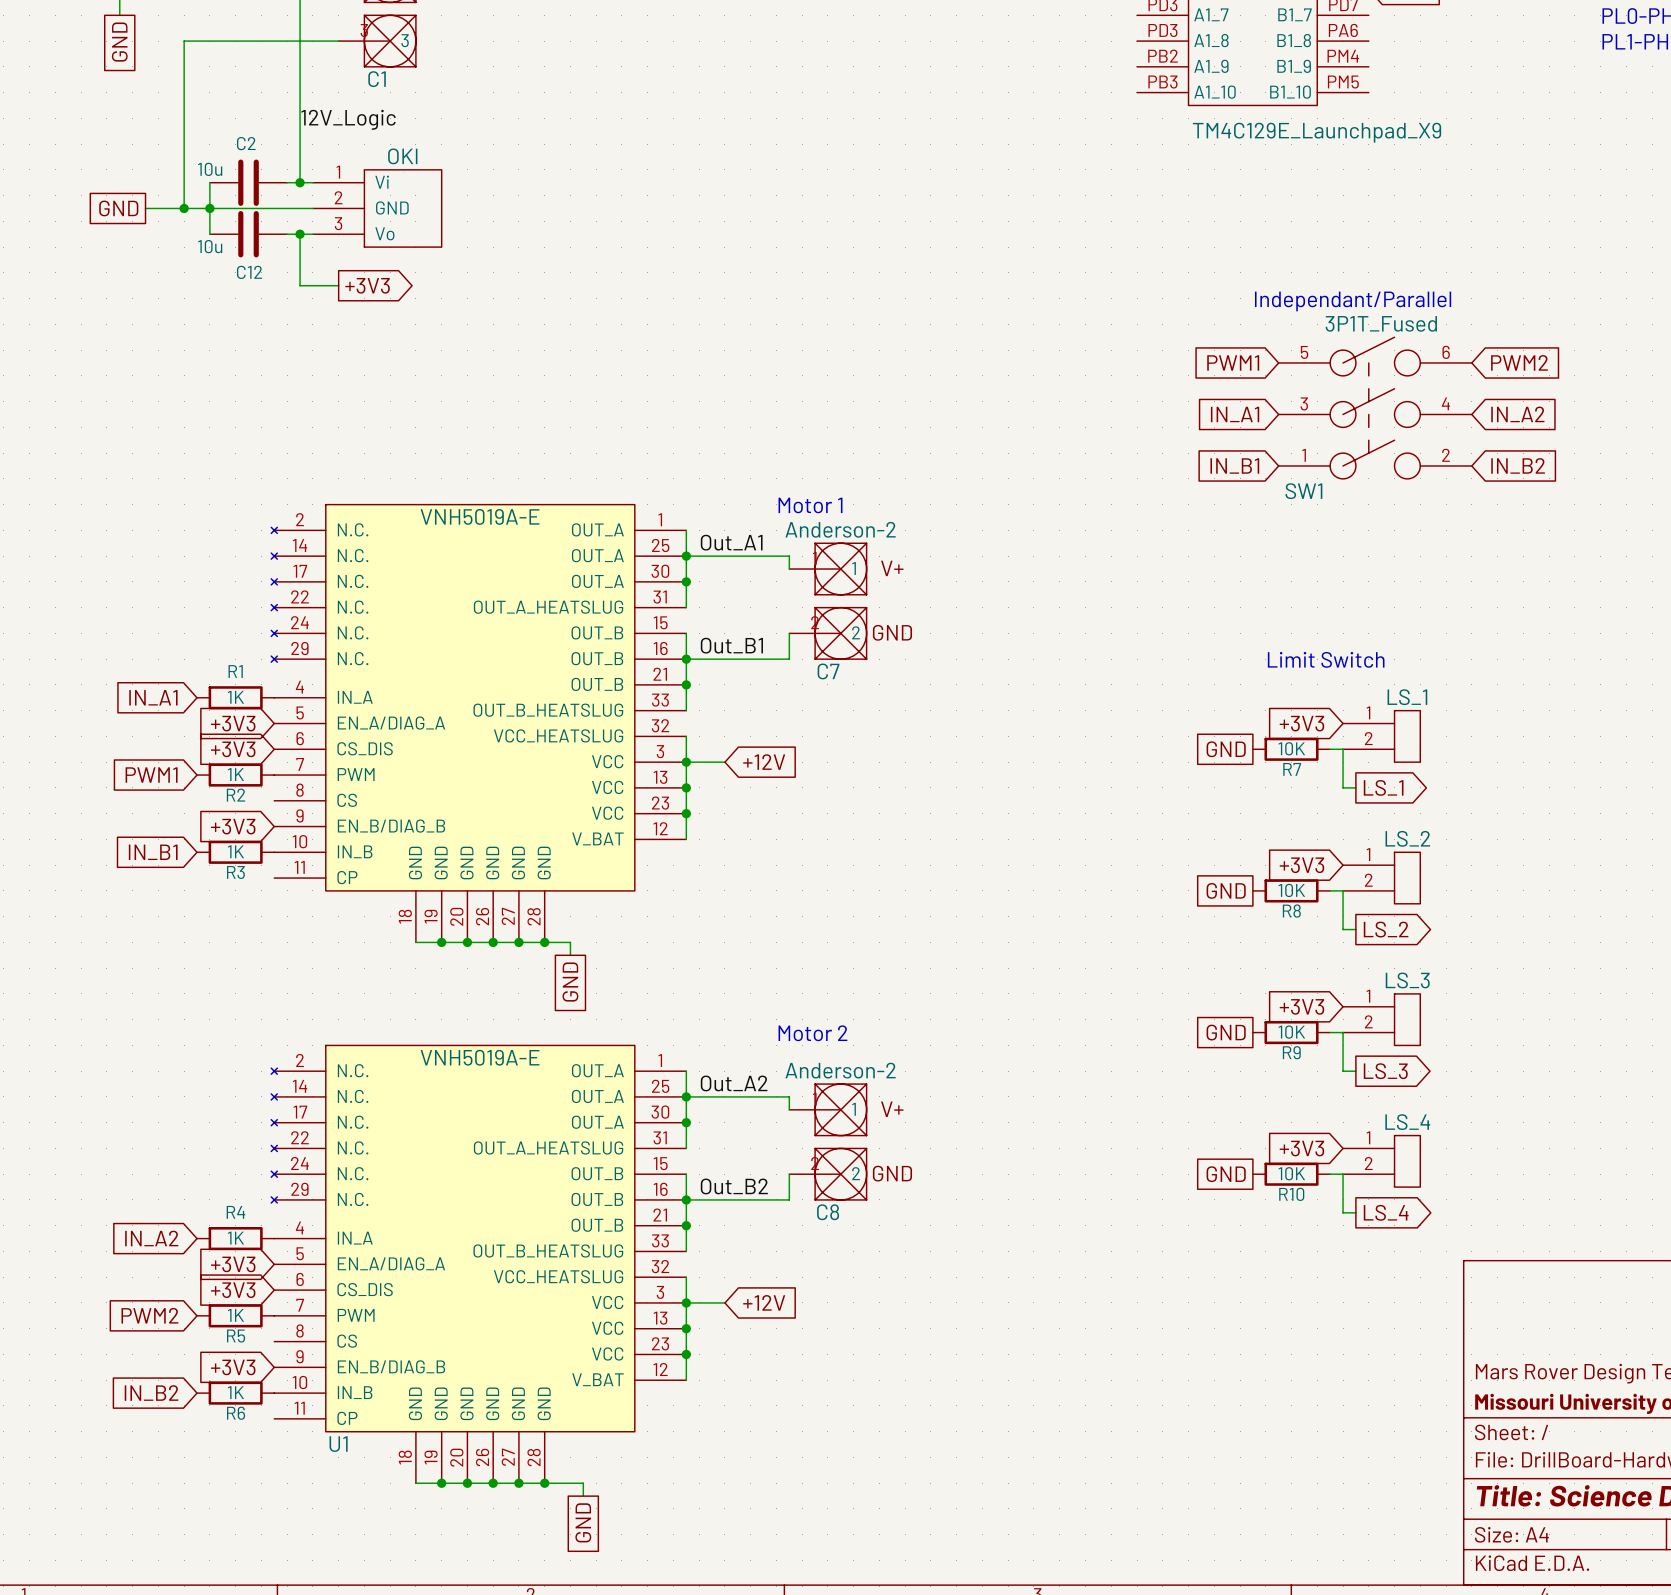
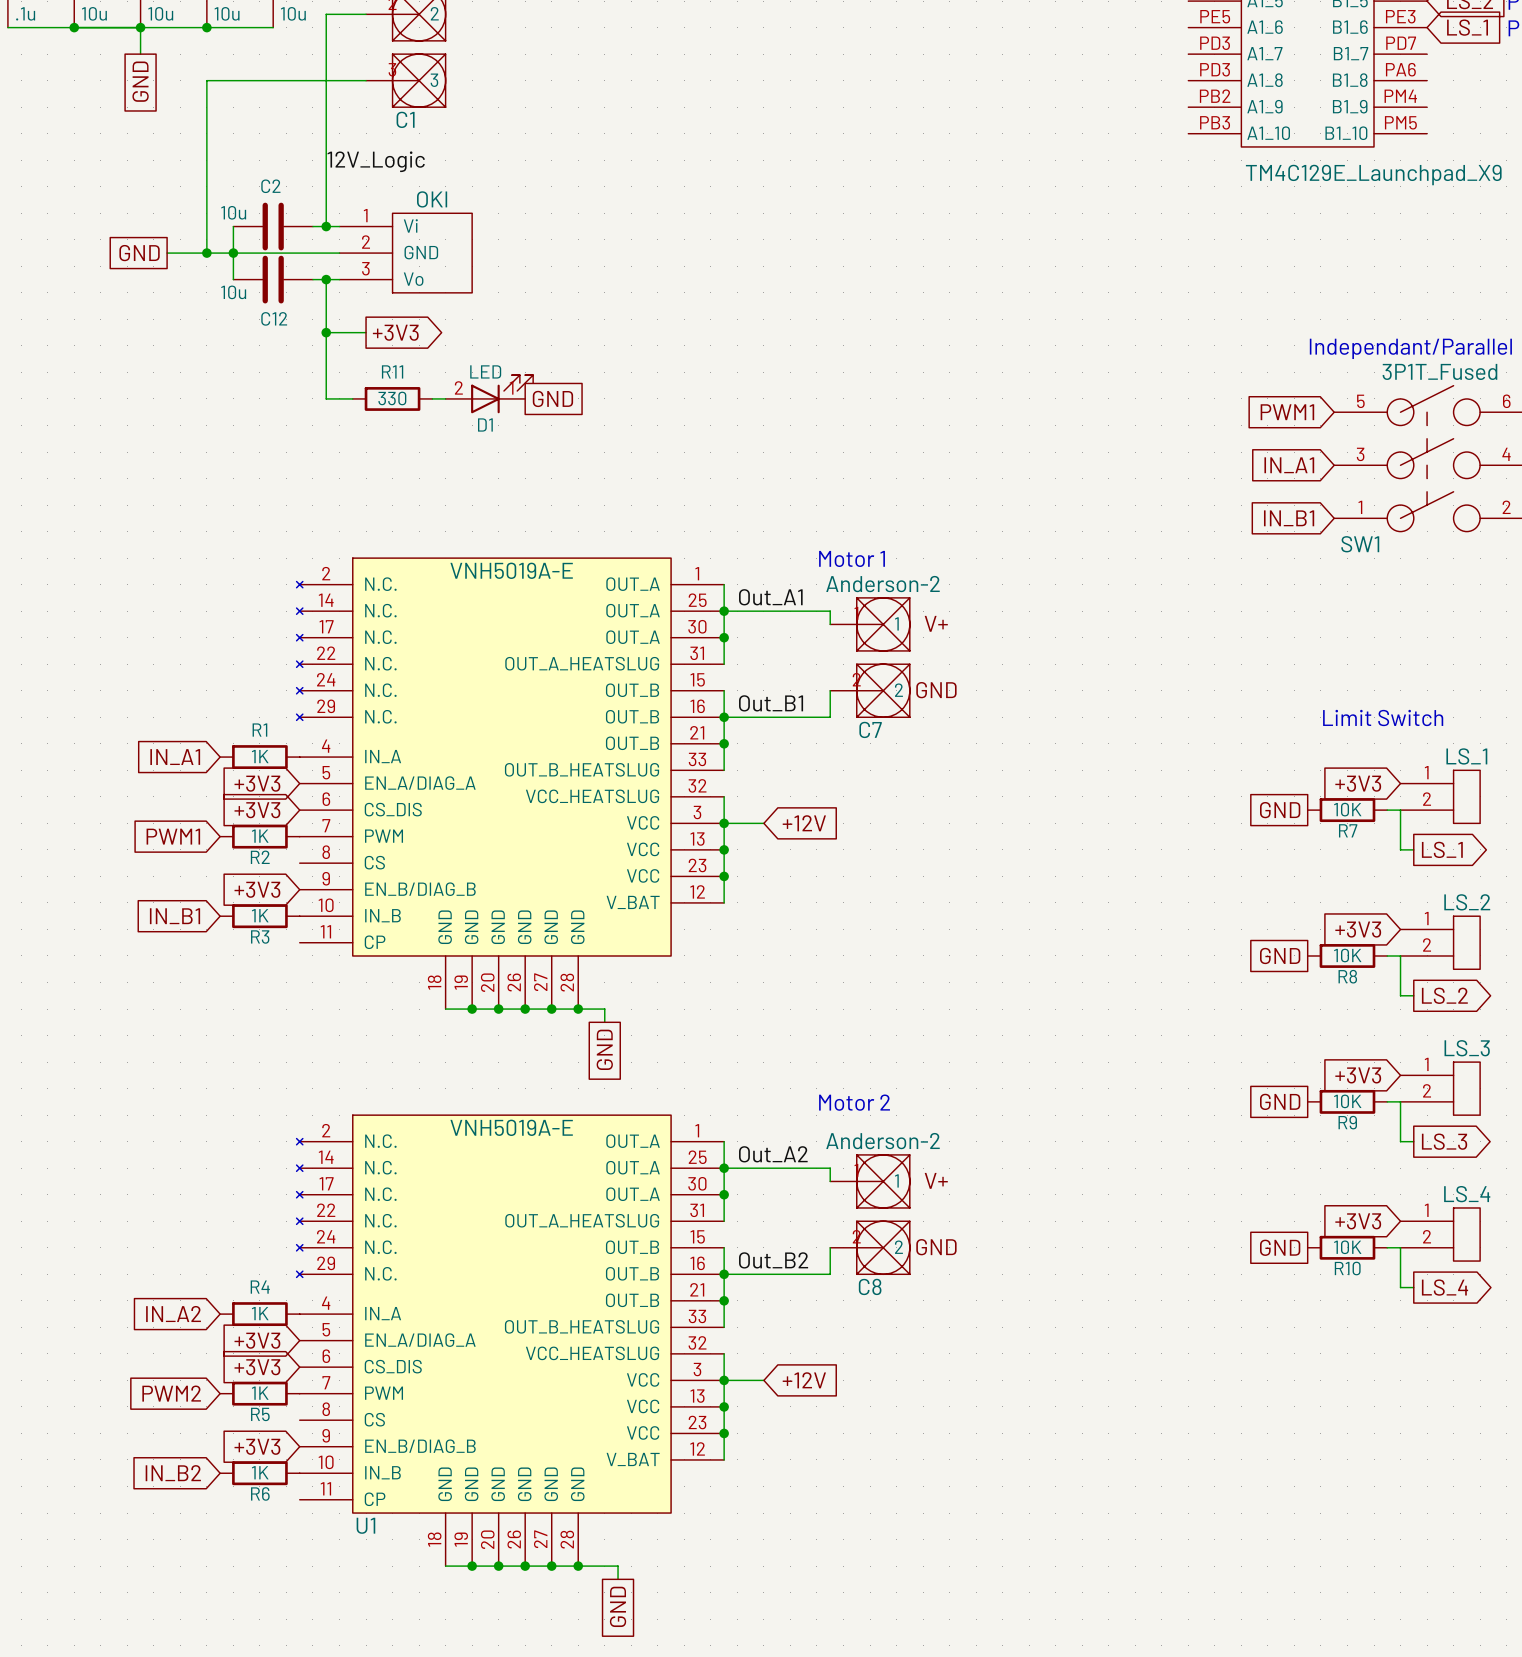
wire: none -> (326, 332) (326, 398) (352, 398)
junction: none -> (326, 332)
D1: none -> LED (489, 394)
R11: none -> 330 (392, 398)
wire: none -> (432, 398) (445, 398)
global label: none -> GND (552, 398)

